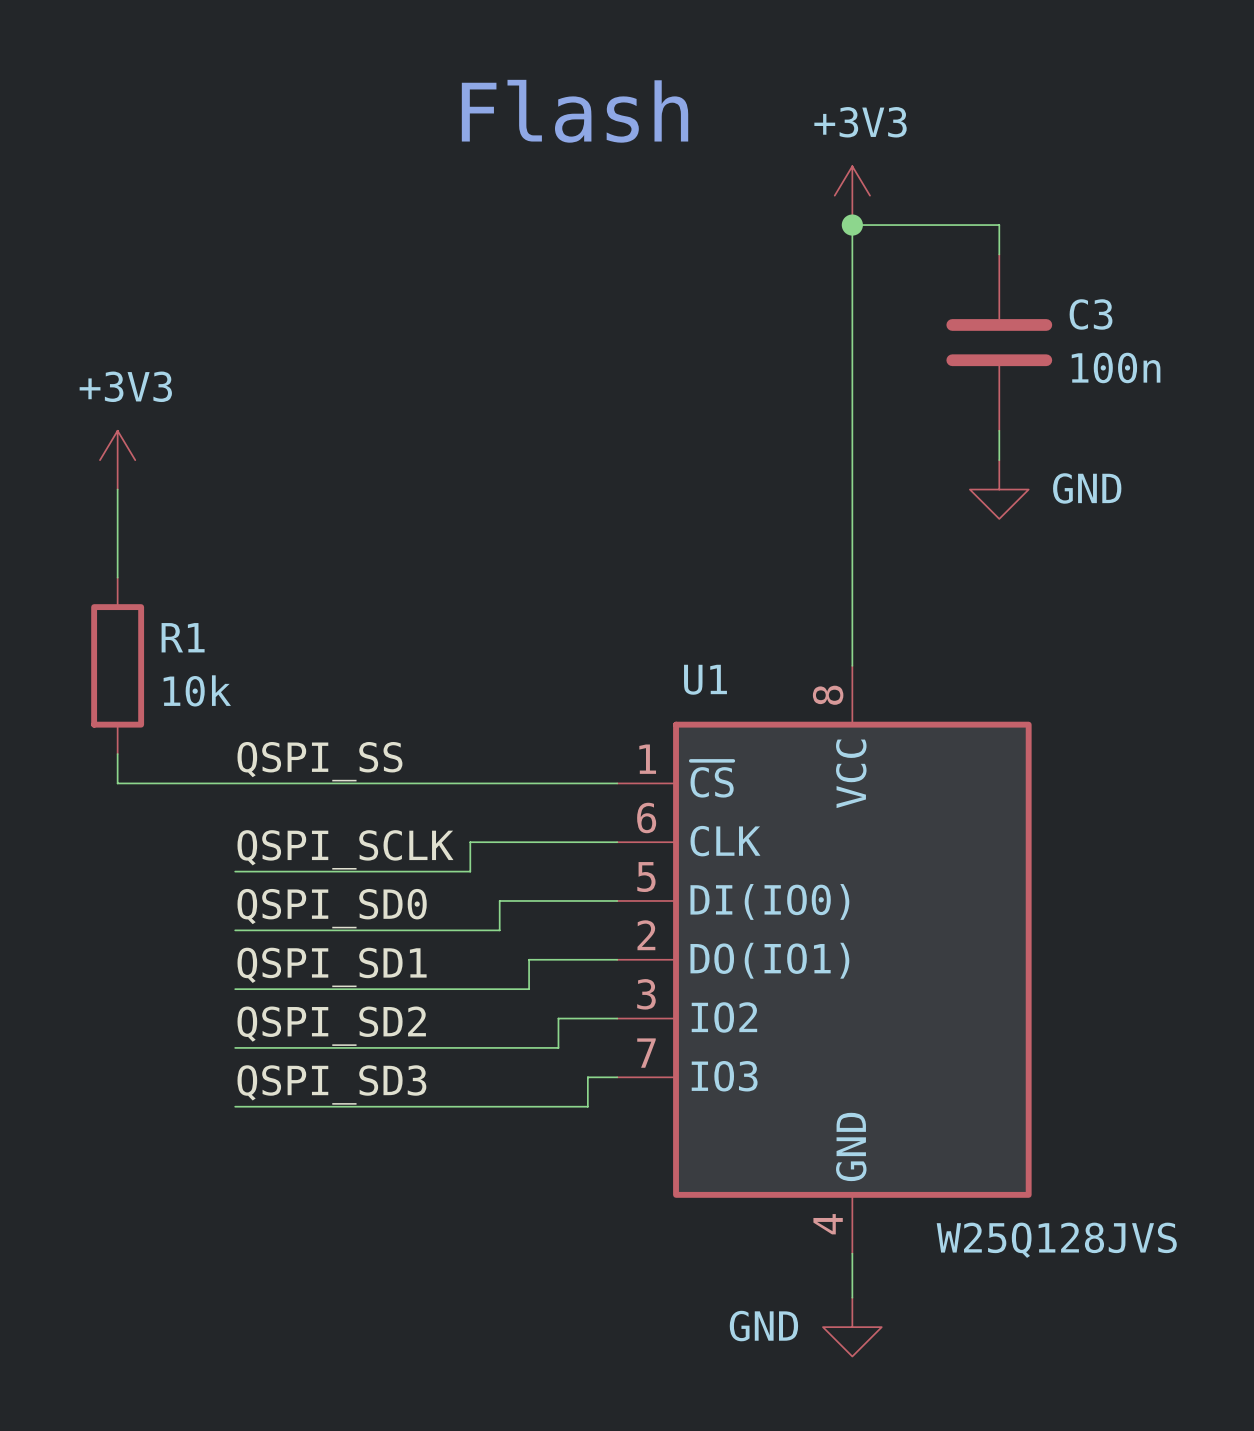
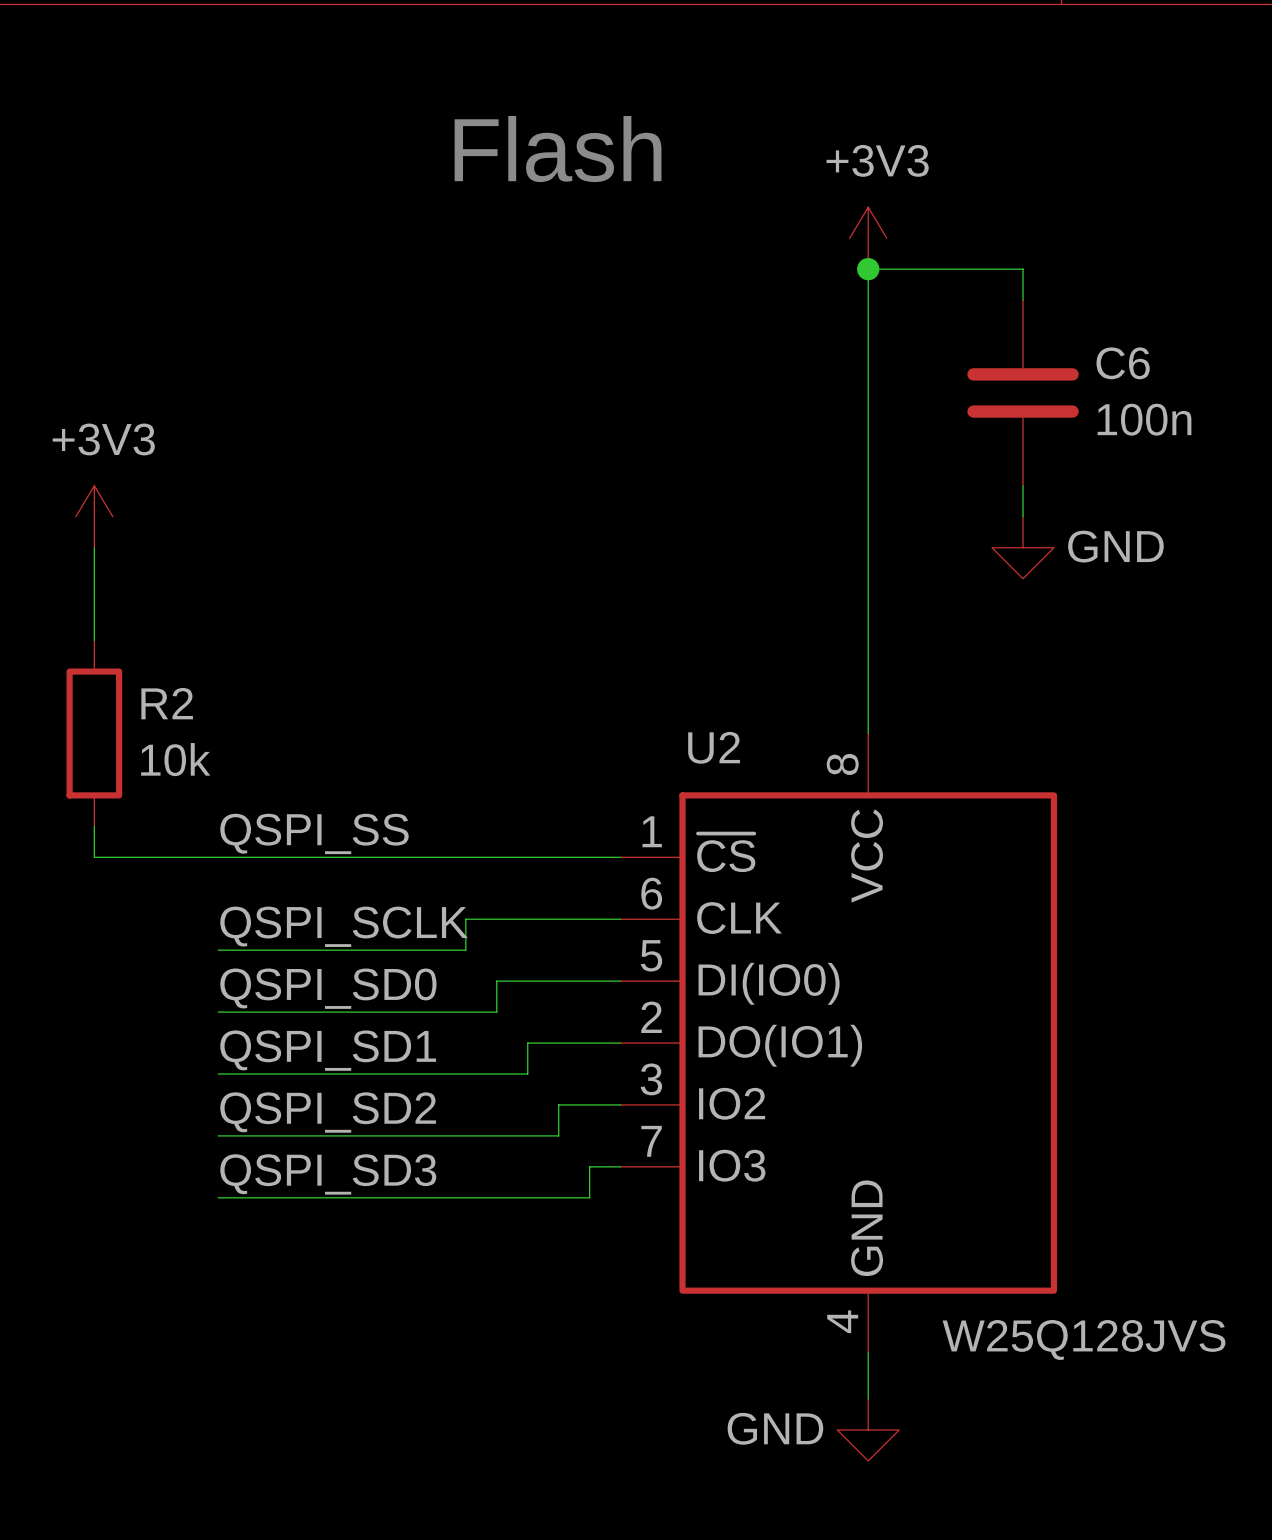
C3 name: C3 (1091, 314) -> C6 (1123, 363)
R1 name: R1 (183, 637) -> R2 (167, 703)
U1 name: U1 (705, 679) -> U2 (714, 747)

